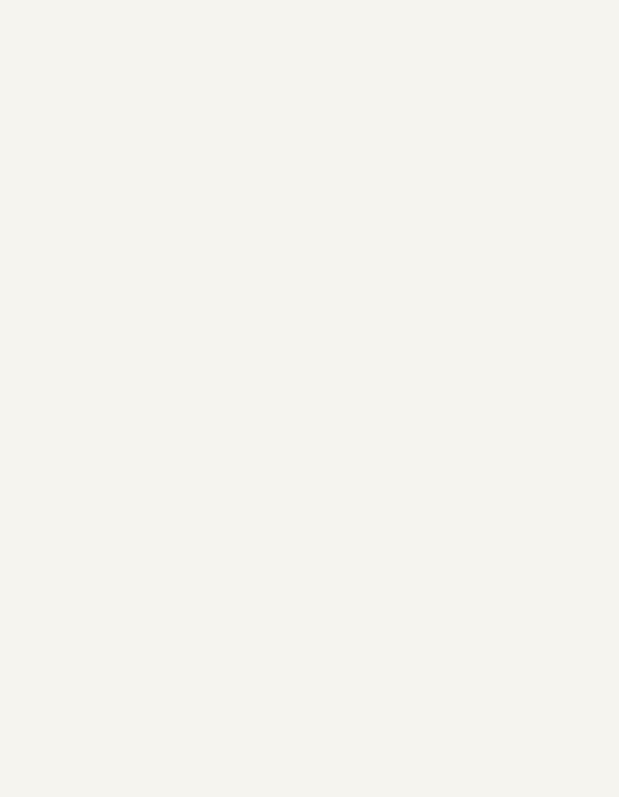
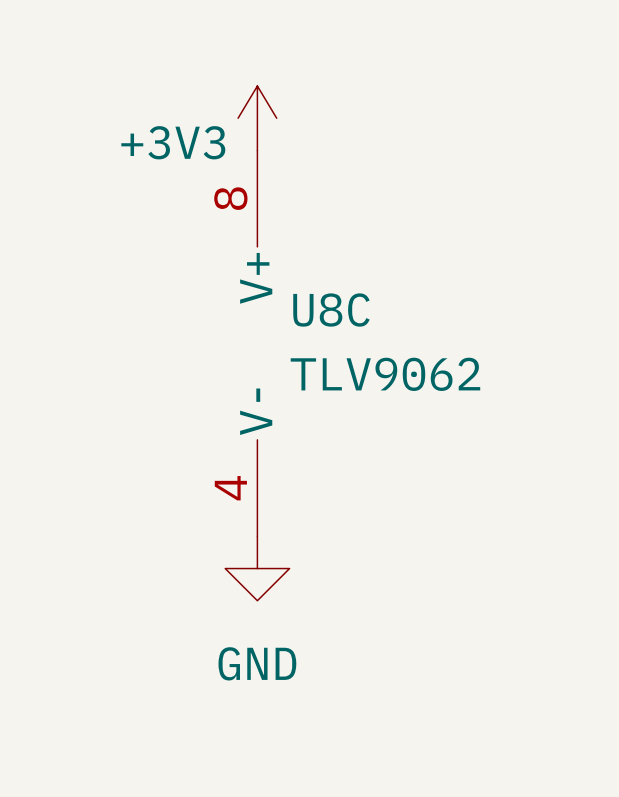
power symbol: none -> +3V3 (257, 118)
U8C: none -> TLV9062 (257, 343)
power symbol: none -> GND (257, 568)

